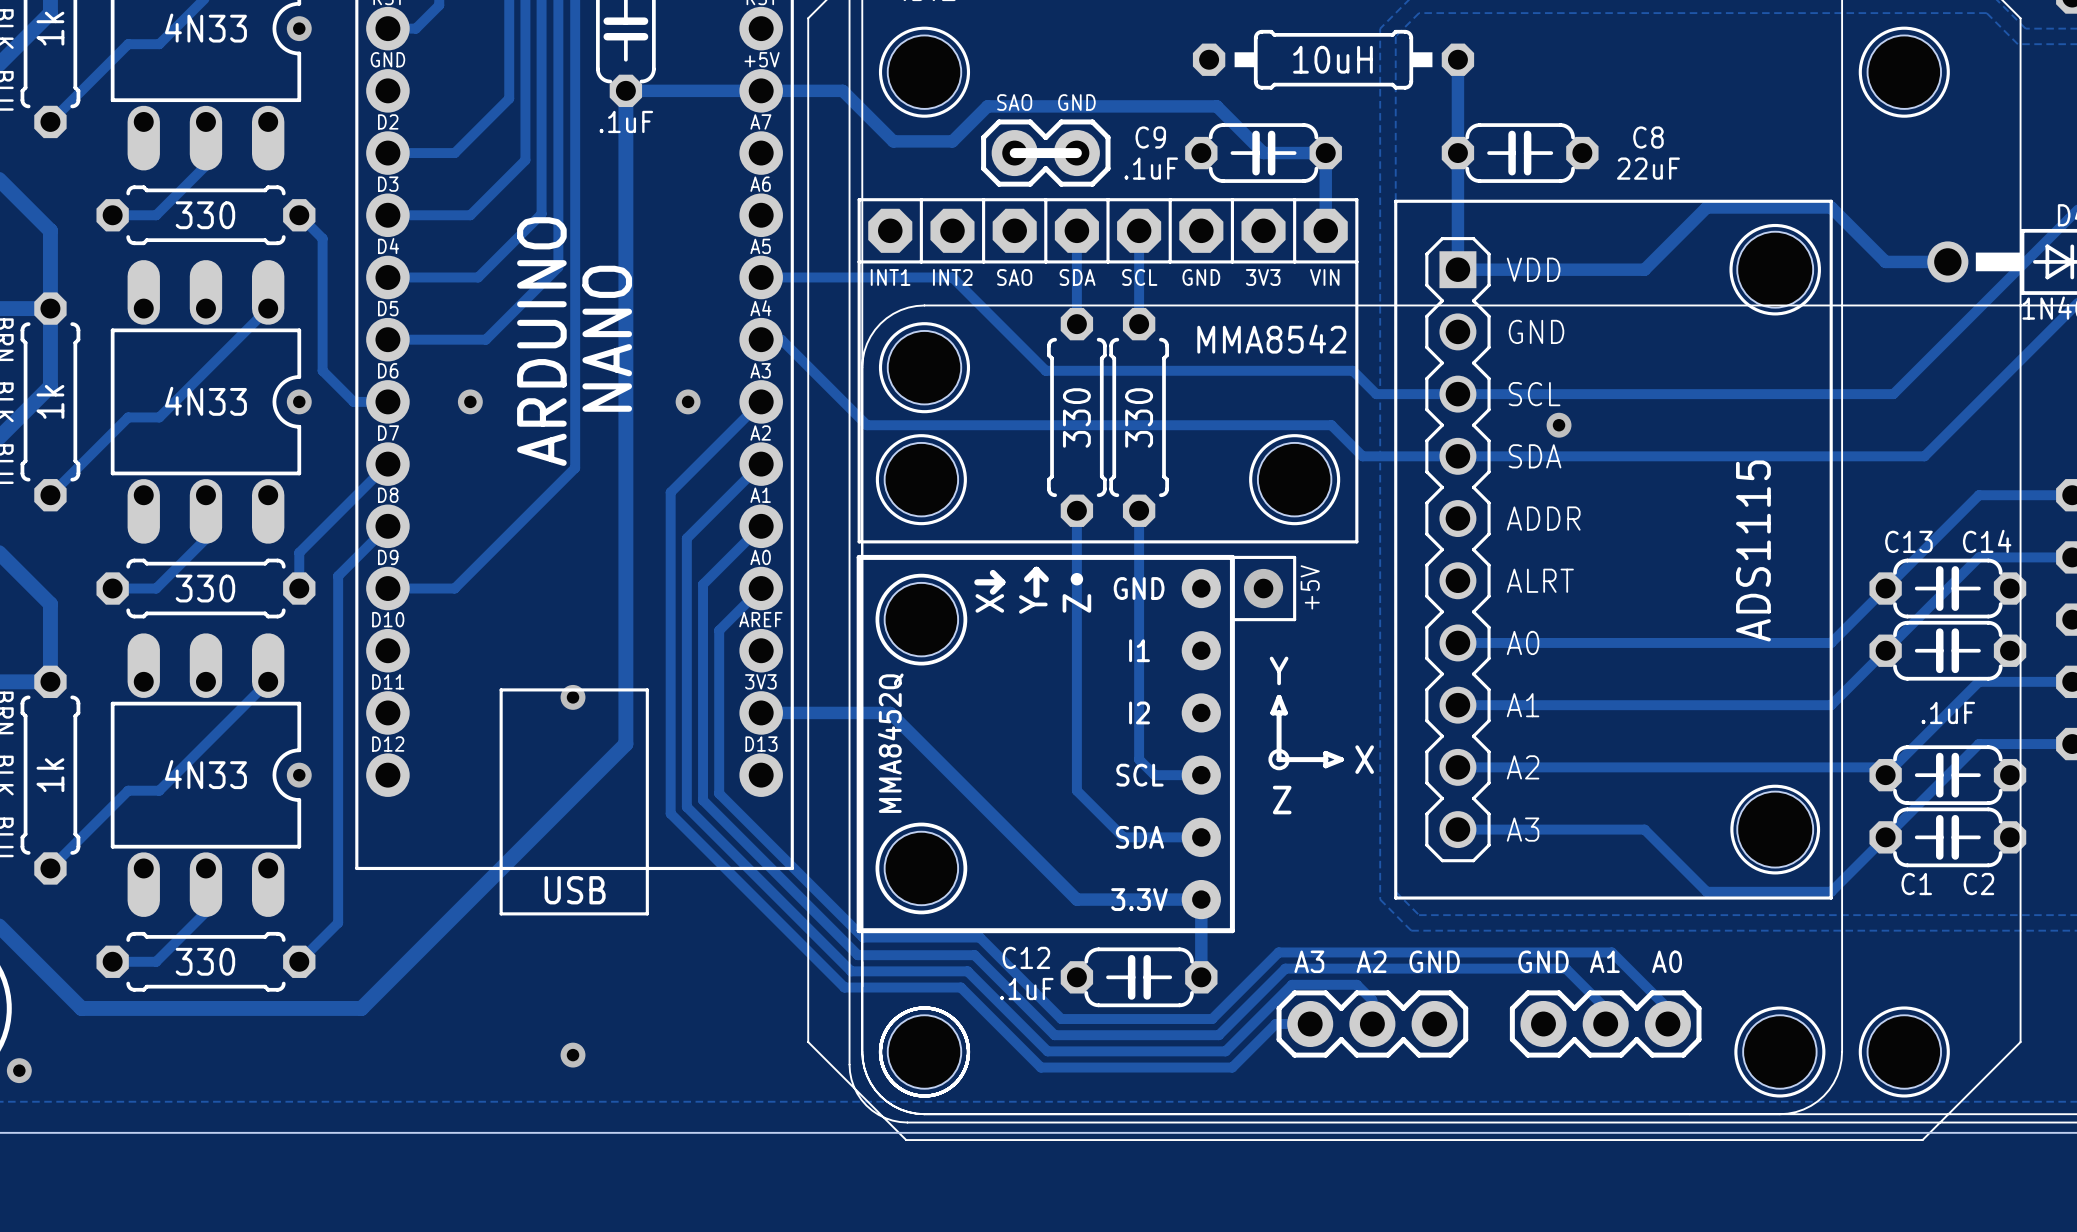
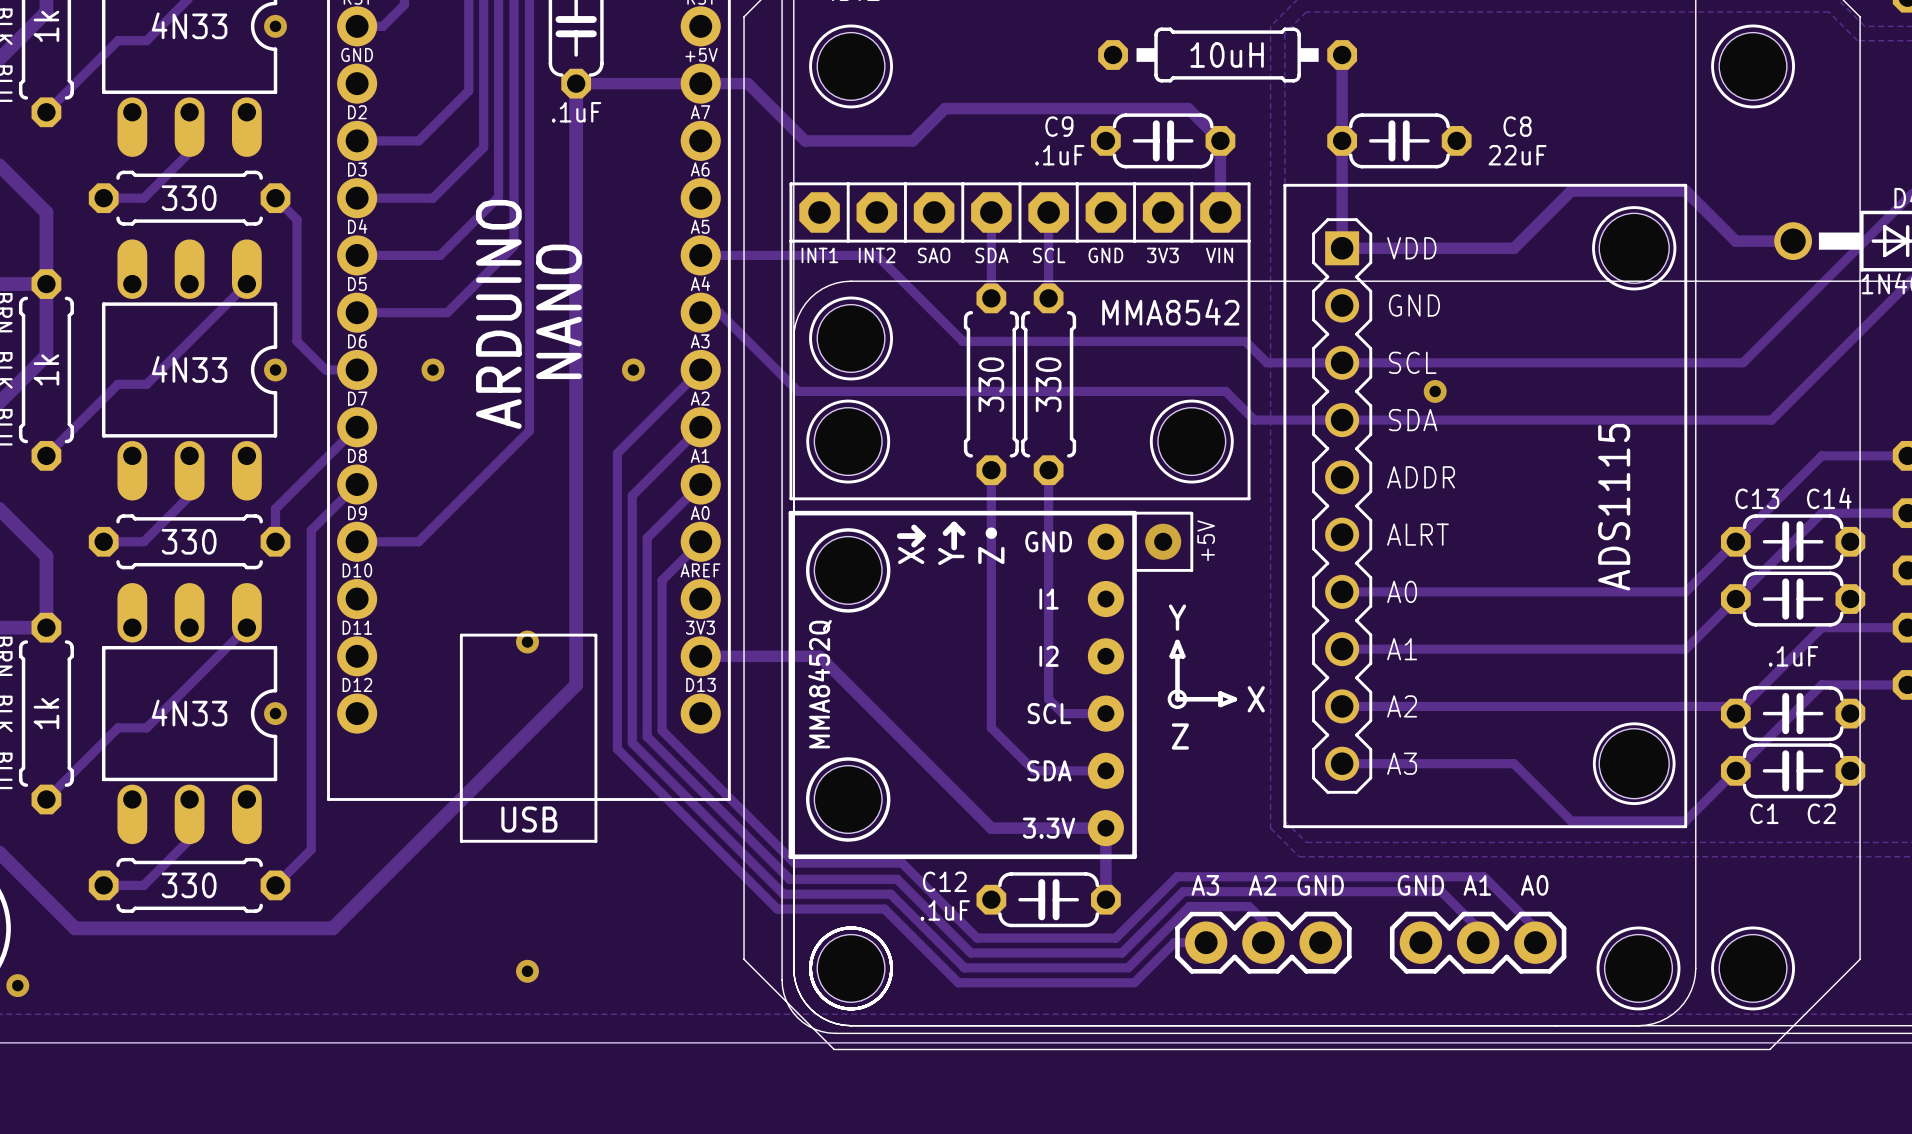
track: (812, 90) (842, 90) (893, 141) (952, 141) (987, 106) (1216, 106) (1263, 153) (1325, 153) -> (747, 83) (805, 140) (912, 140) (945, 108) (1188, 108) (1220, 140)
text: GND (1076, 102) -> none
line: (1014, 153) (1076, 153) -> none
SAO: (1045, 153) -> none

